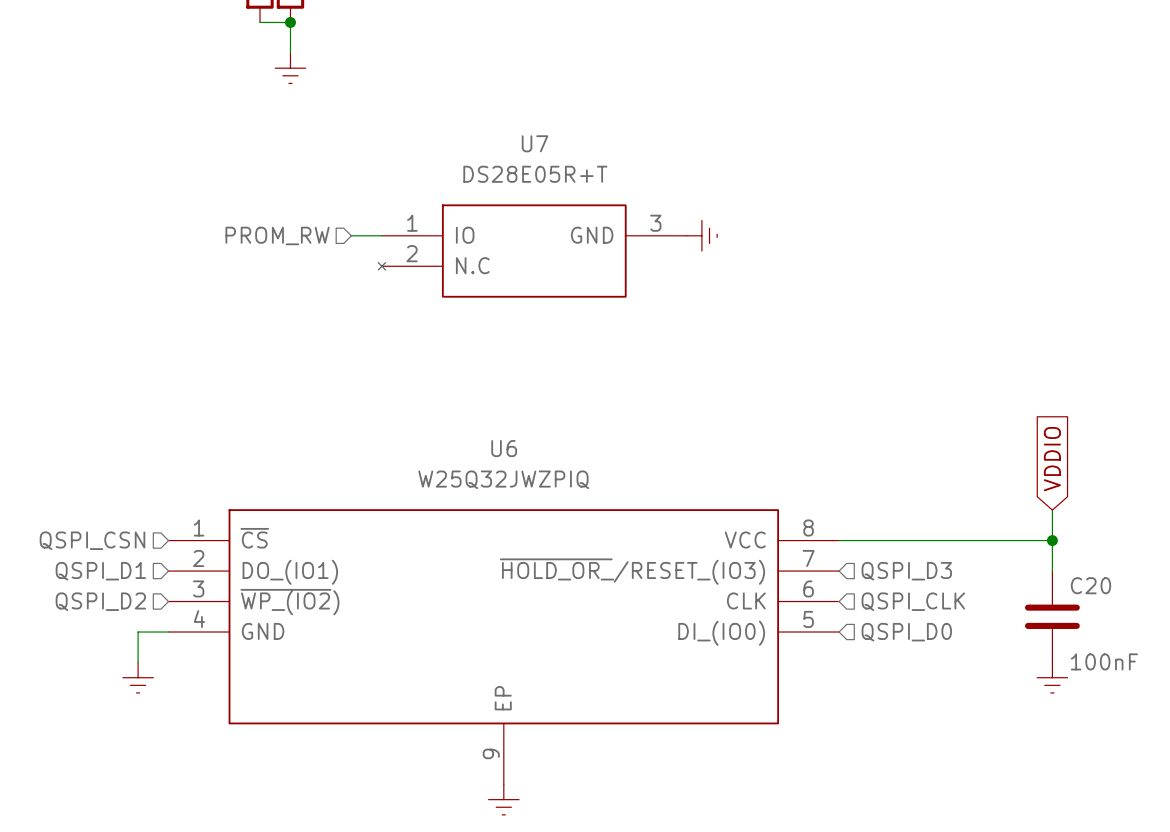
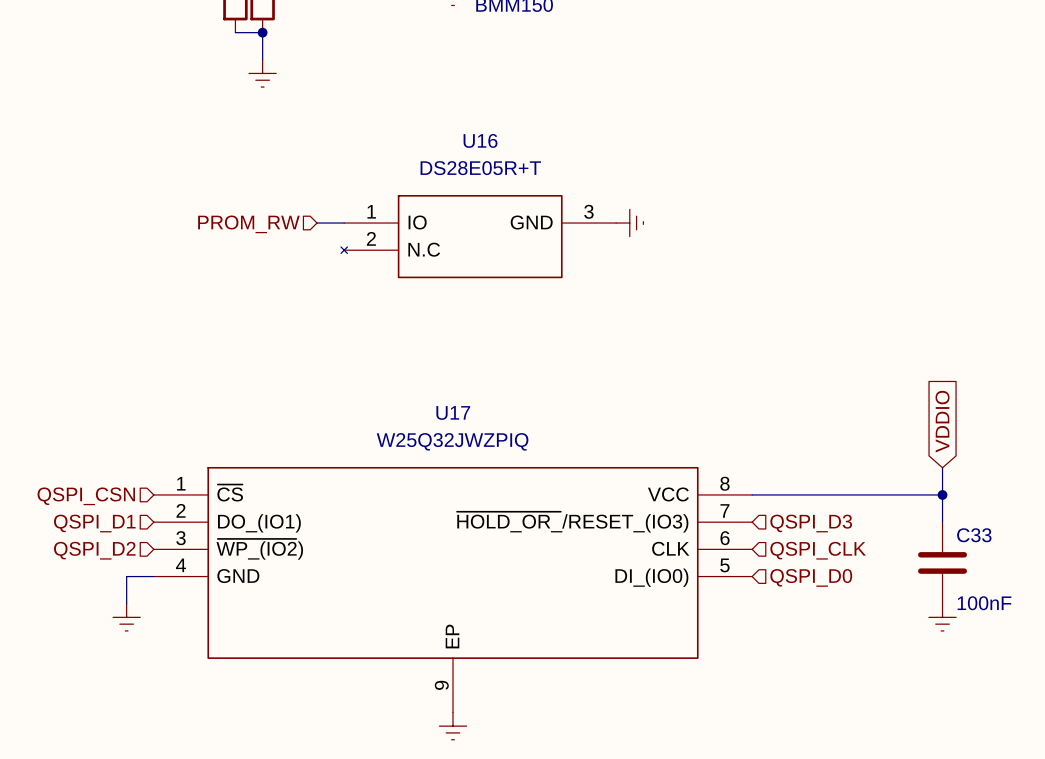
U7 name: U7 (535, 143) -> U16 (480, 140)
U6 name: U6 (504, 448) -> U17 (453, 412)
C20 name: C20 (1090, 585) -> C33 (974, 535)

